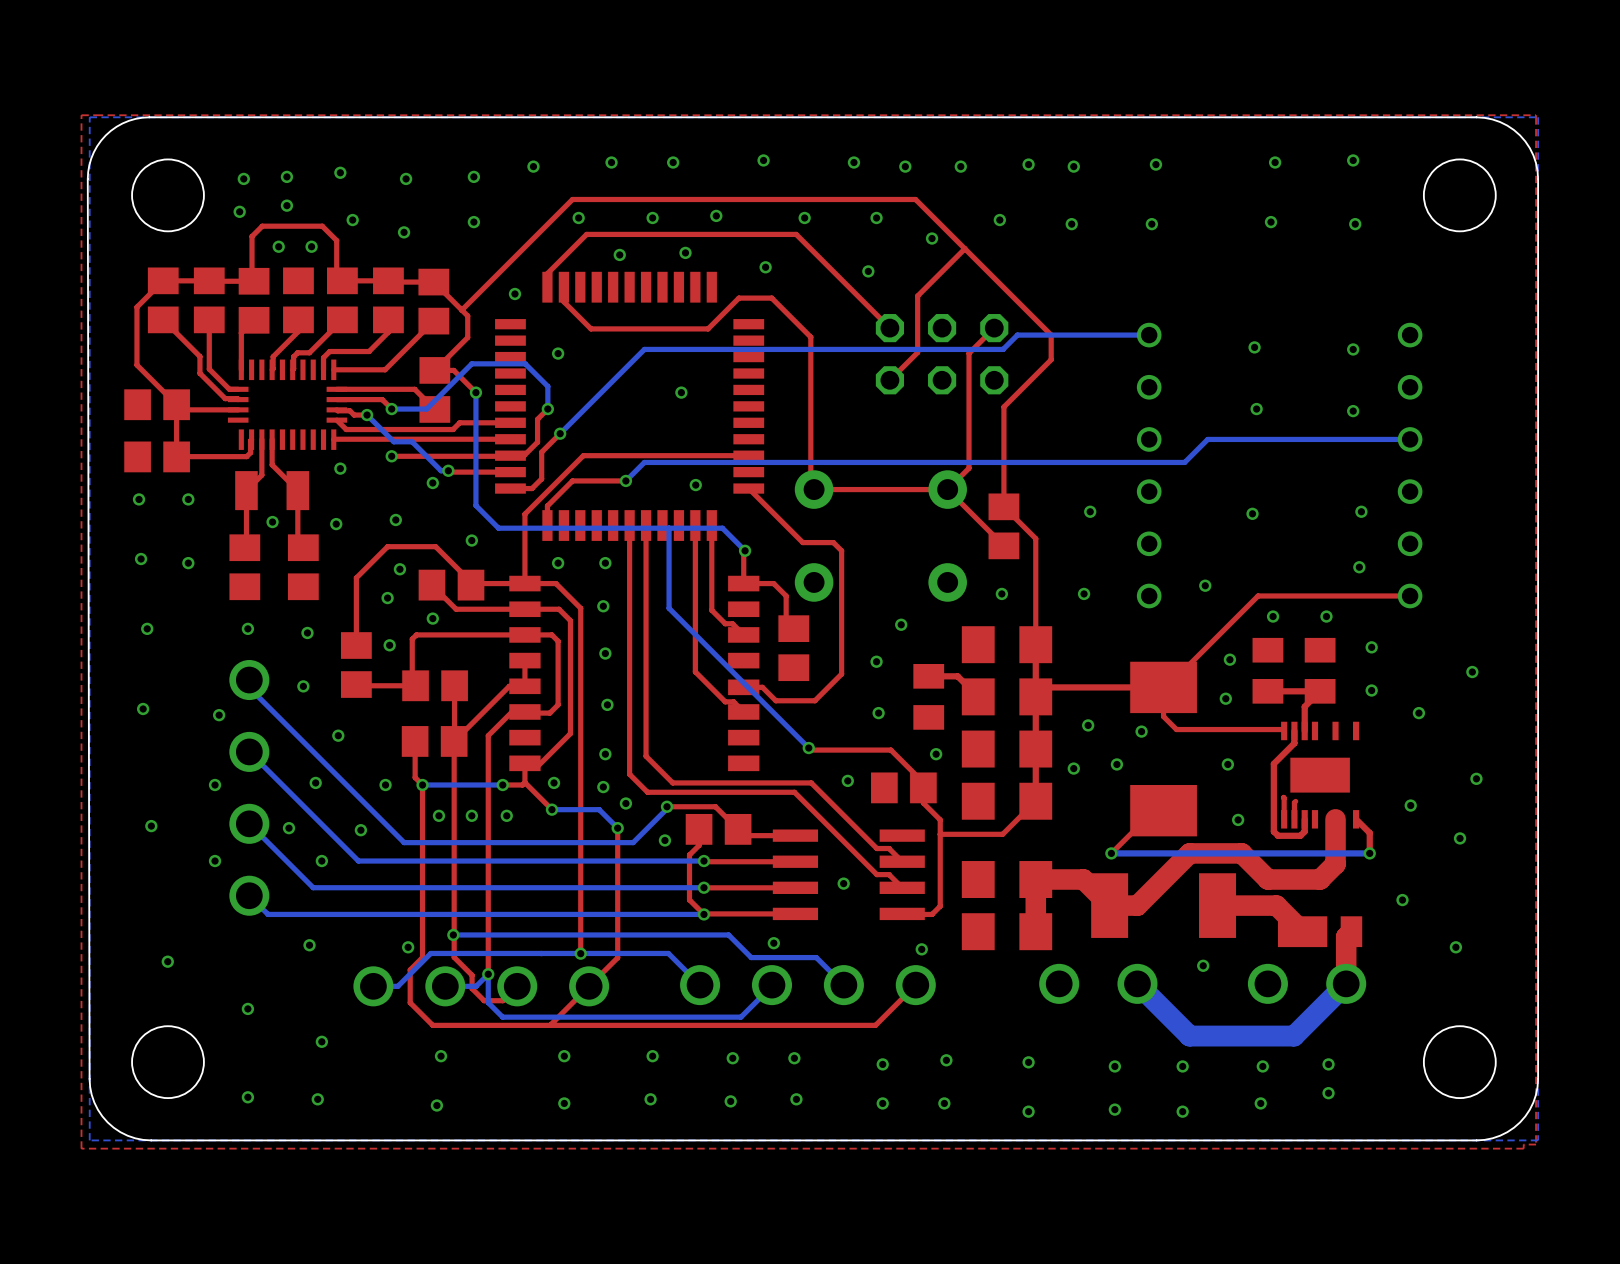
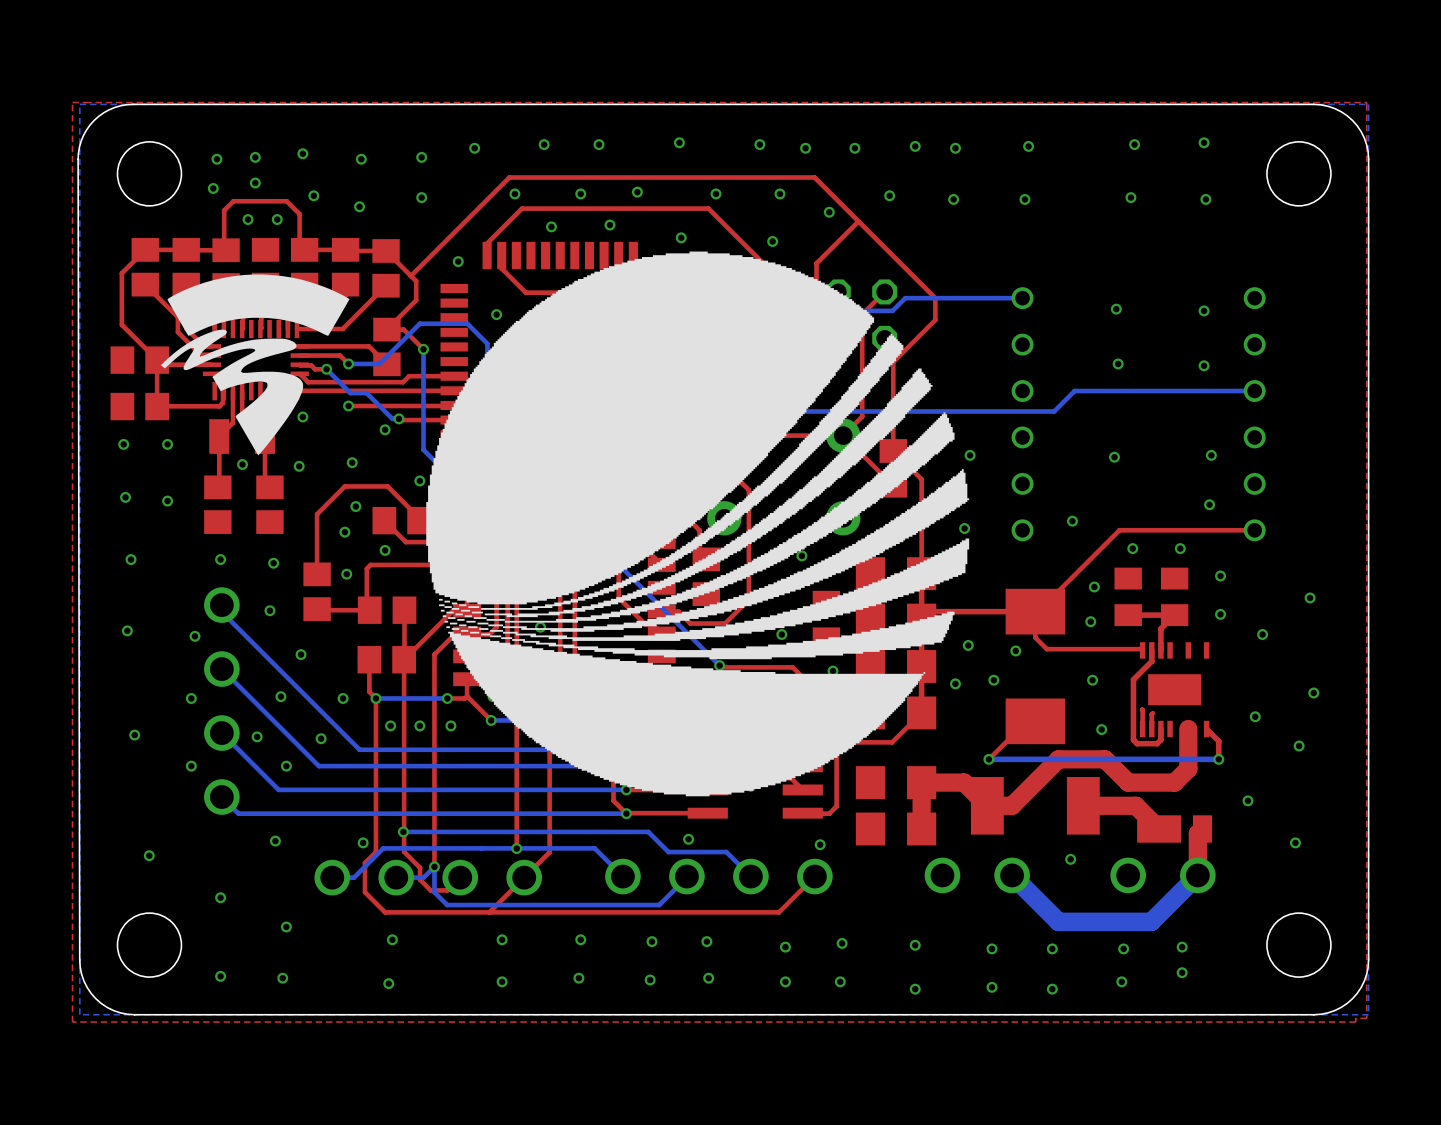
drawing: none -> [426, 251, 970, 797]
drawing: none -> [160, 274, 350, 456]

